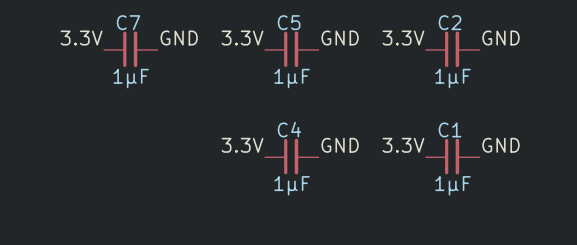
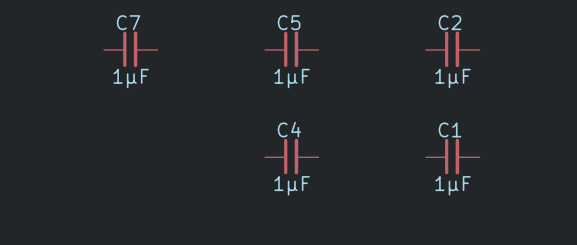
label: 3.3V (81, 38) -> none
label: GND (179, 38) -> none
label: 3.3V (242, 38) -> none
label: GND (340, 38) -> none
label: 3.3V (403, 38) -> none
label: GND (501, 38) -> none
label: 3.3V (242, 145) -> none
label: GND (340, 145) -> none
label: 3.3V (403, 145) -> none
label: GND (501, 145) -> none

